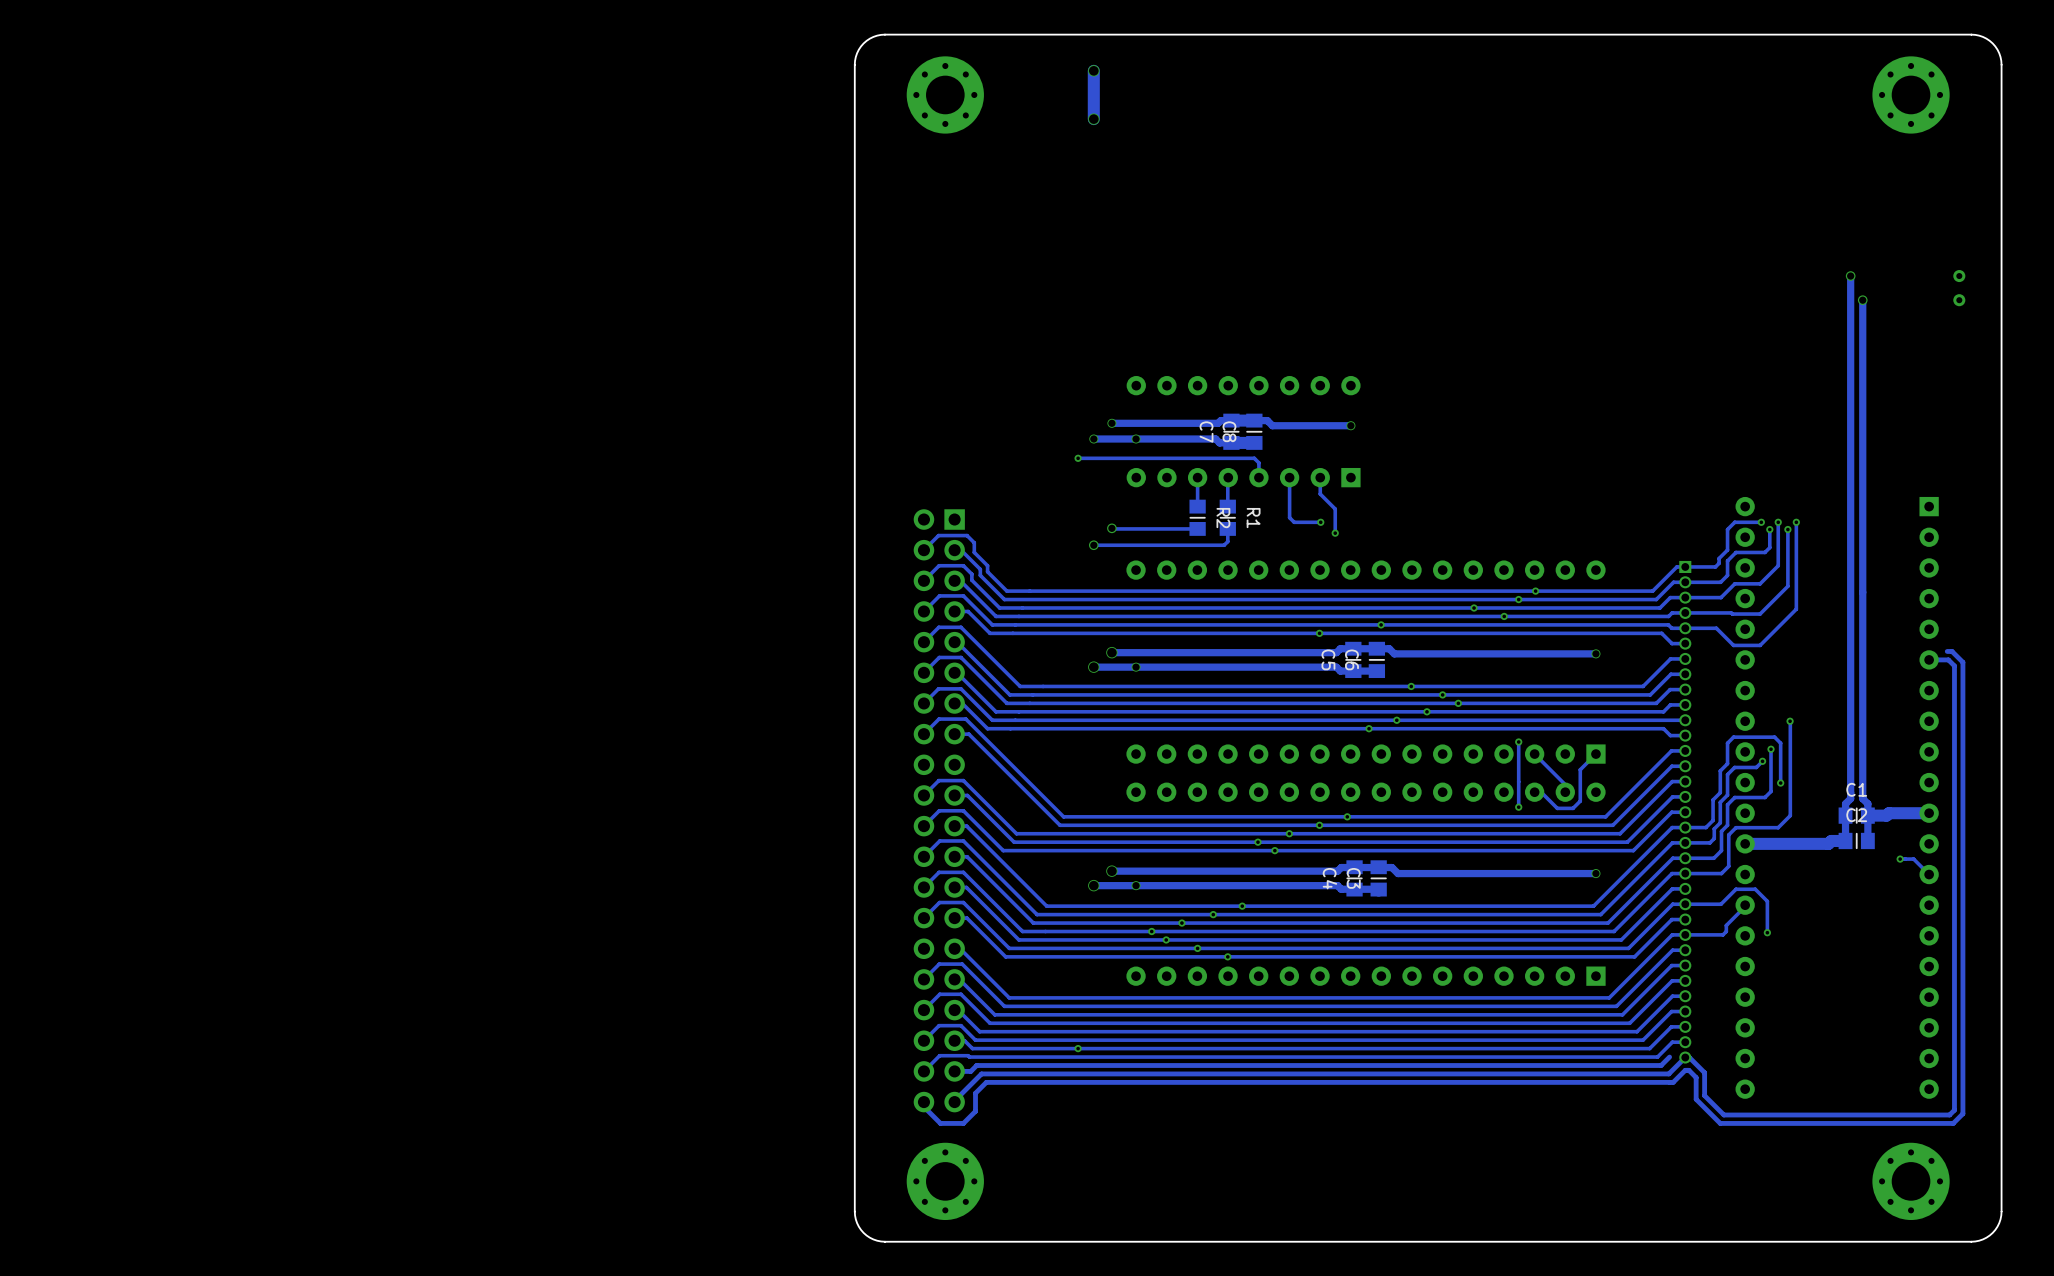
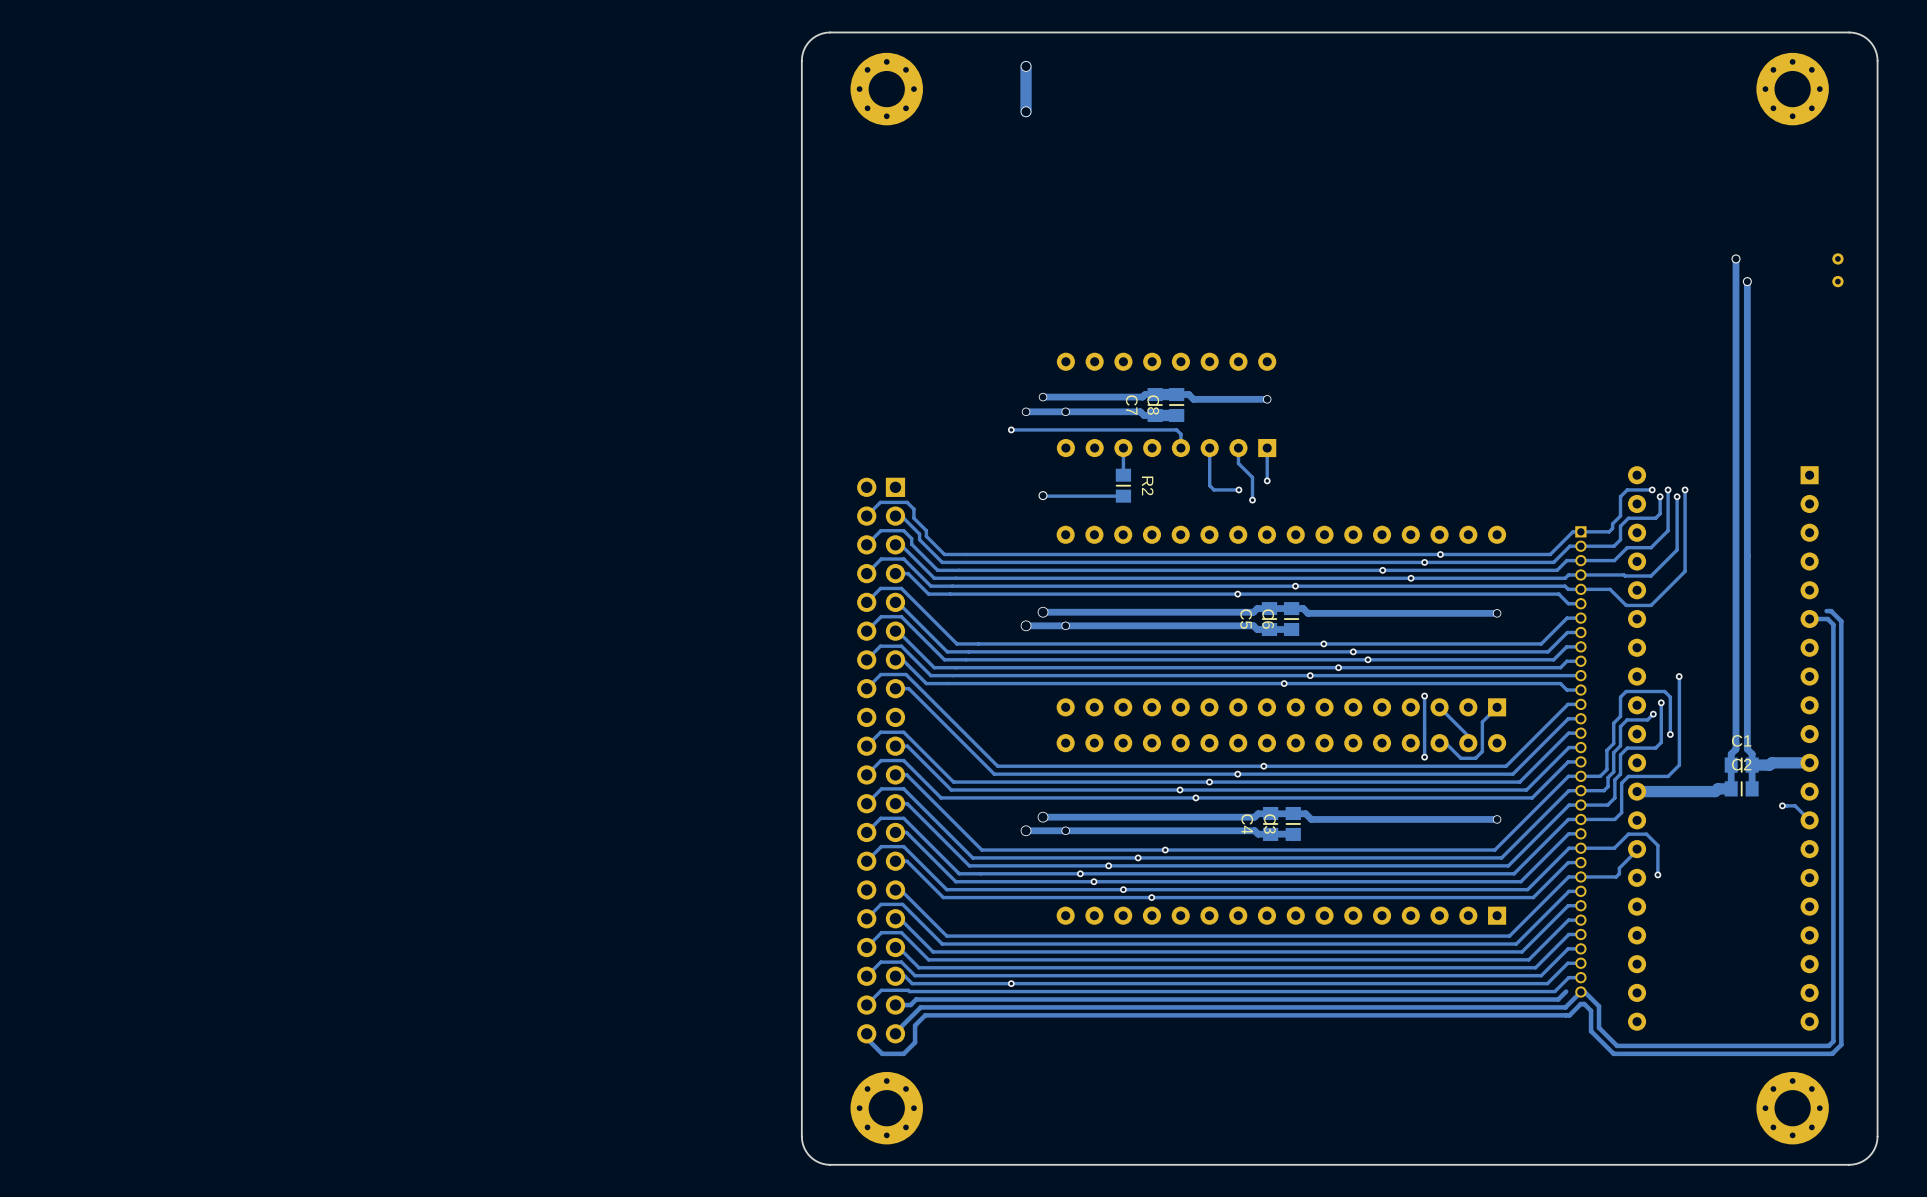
track: none -> (1267, 448) (1267, 480)
track: (1227, 478) (1227, 506) -> none
via: none -> (1267, 480)
R1: (1227, 517) -> none
track: (1227, 528) (1227, 541) (1224, 545) (1093, 545) -> none
via: (1093, 545) -> none

